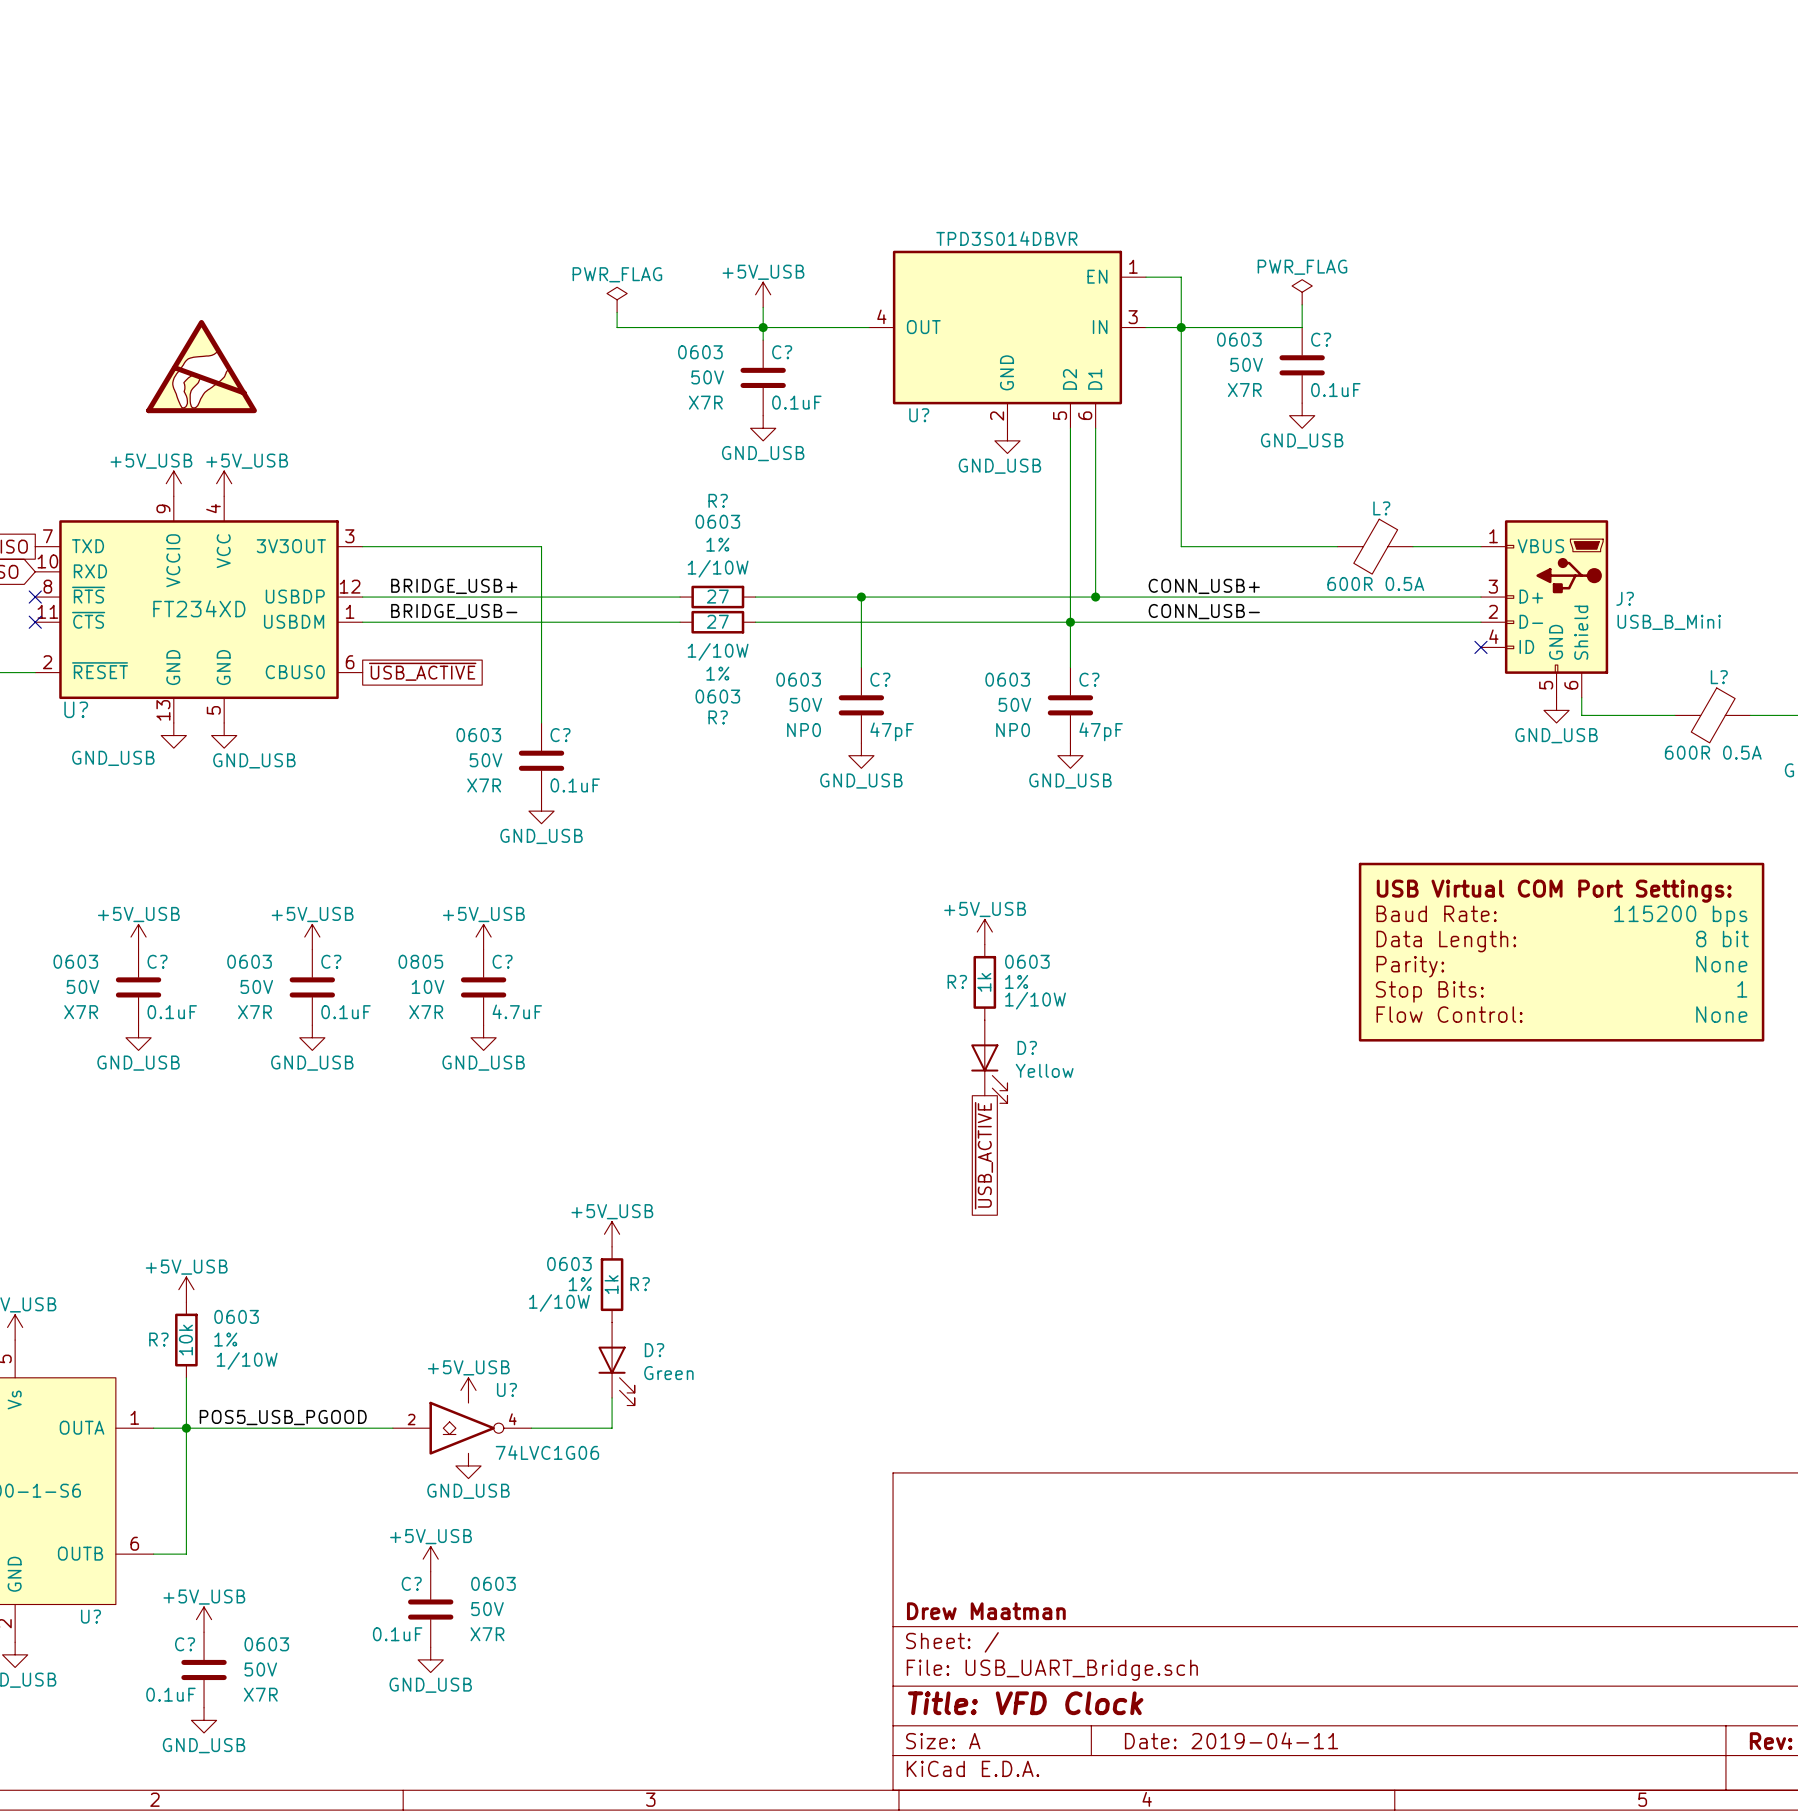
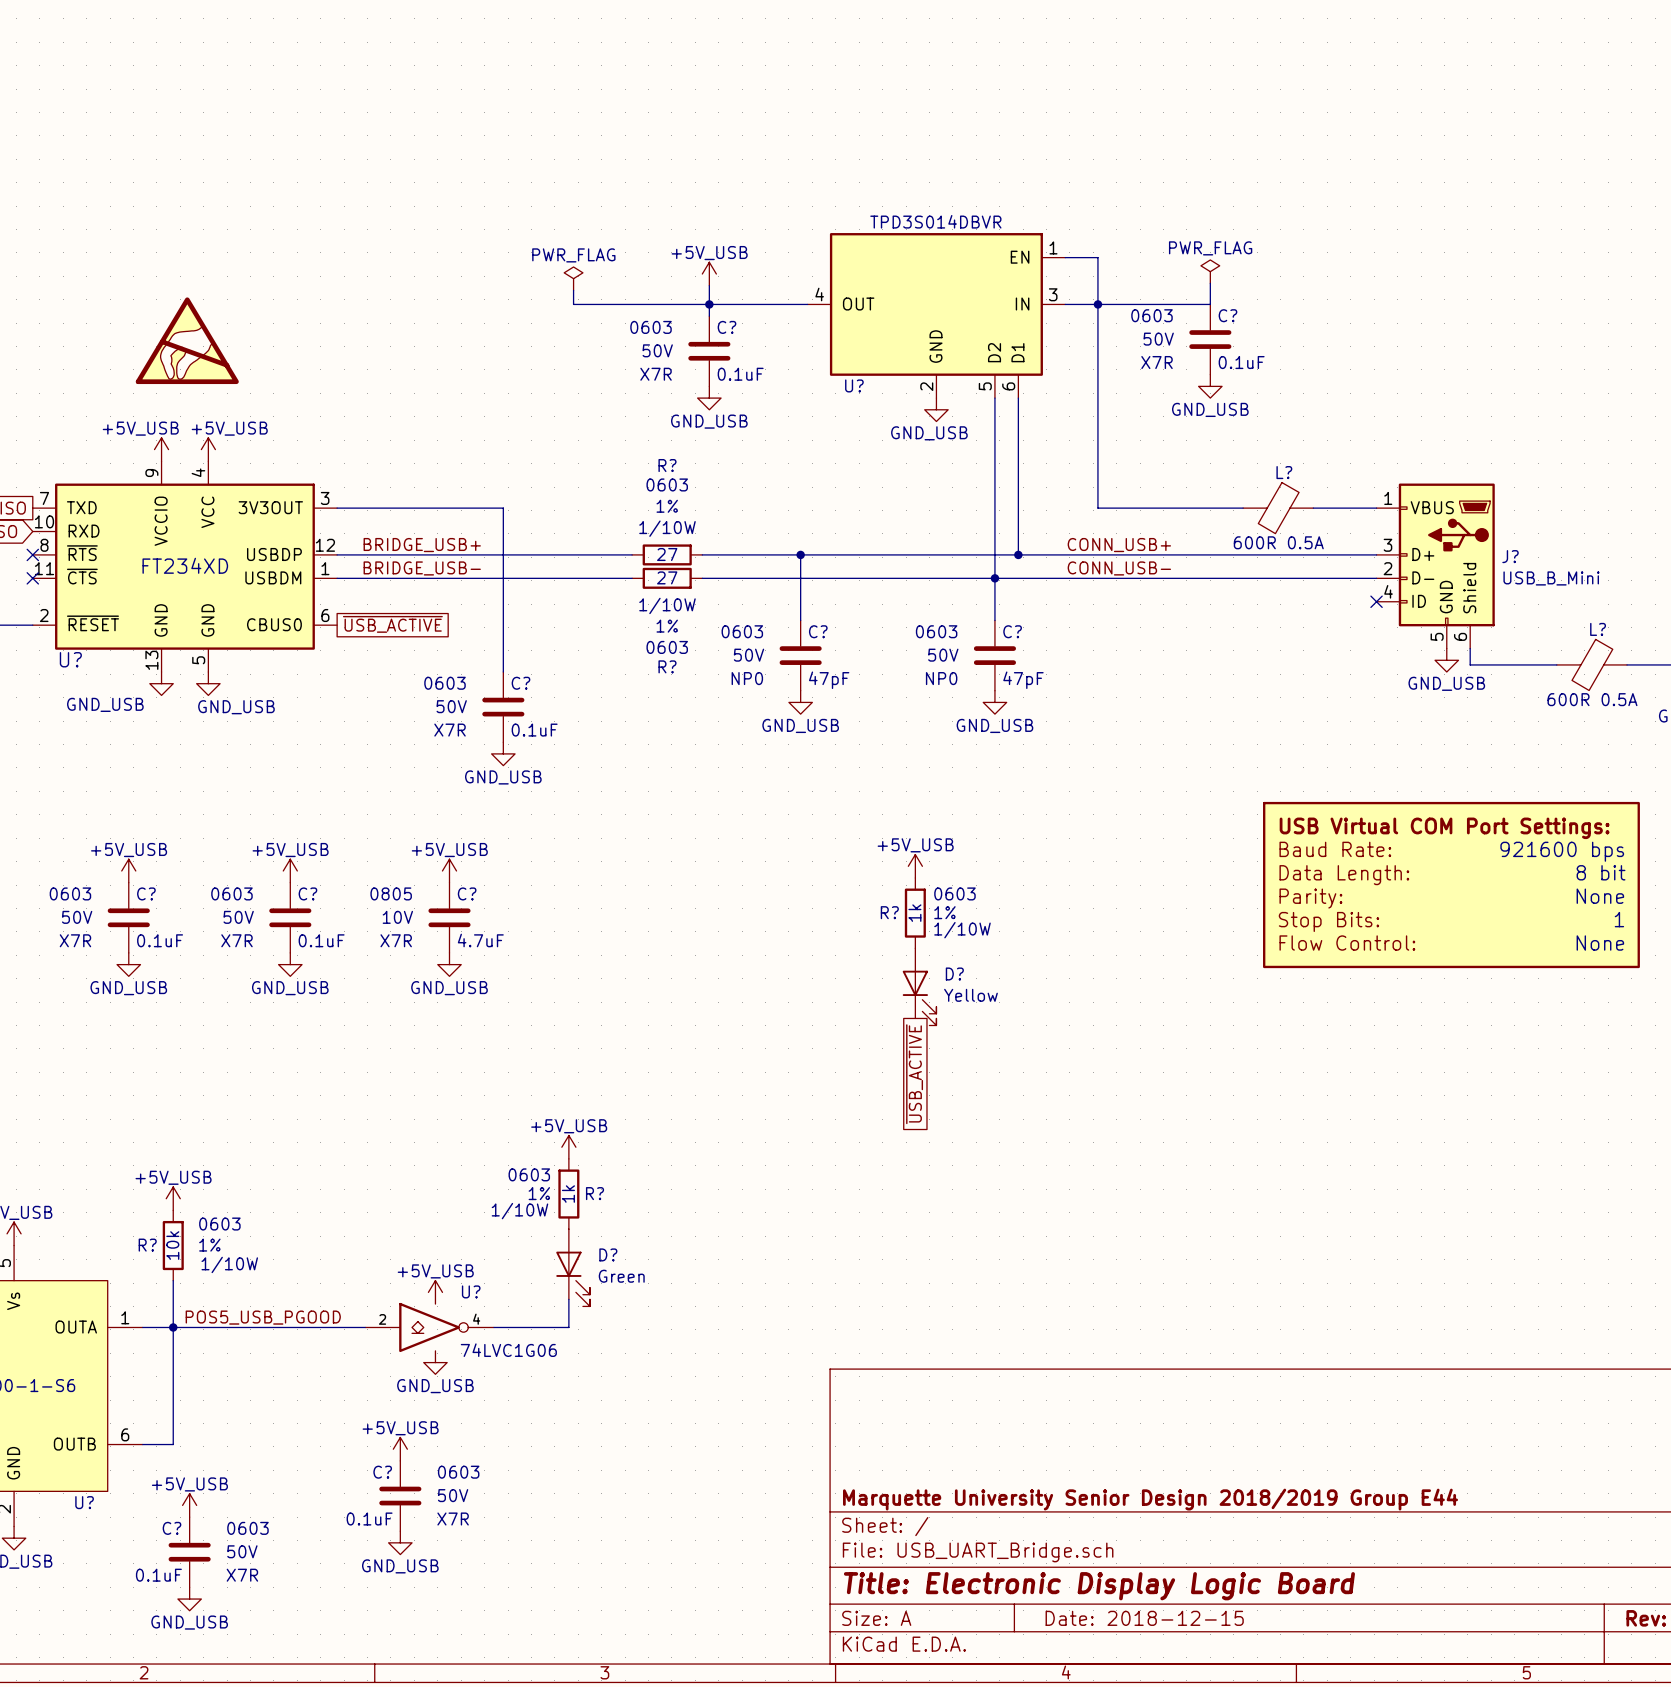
part text: 115200 bps (1680, 916) -> 921600 bps (1562, 851)
title block: Drew Maatman (986, 1611) -> Marquette University Senior Design 2018/2019 Group E44 (1150, 1499)
title block: Title: VFD Clock (1025, 1703) -> Title: Electronic Display Logic Board (1099, 1586)
title block: Date: 2019-04-11 (1231, 1740) -> Date: 2018-12-15 (1144, 1618)

